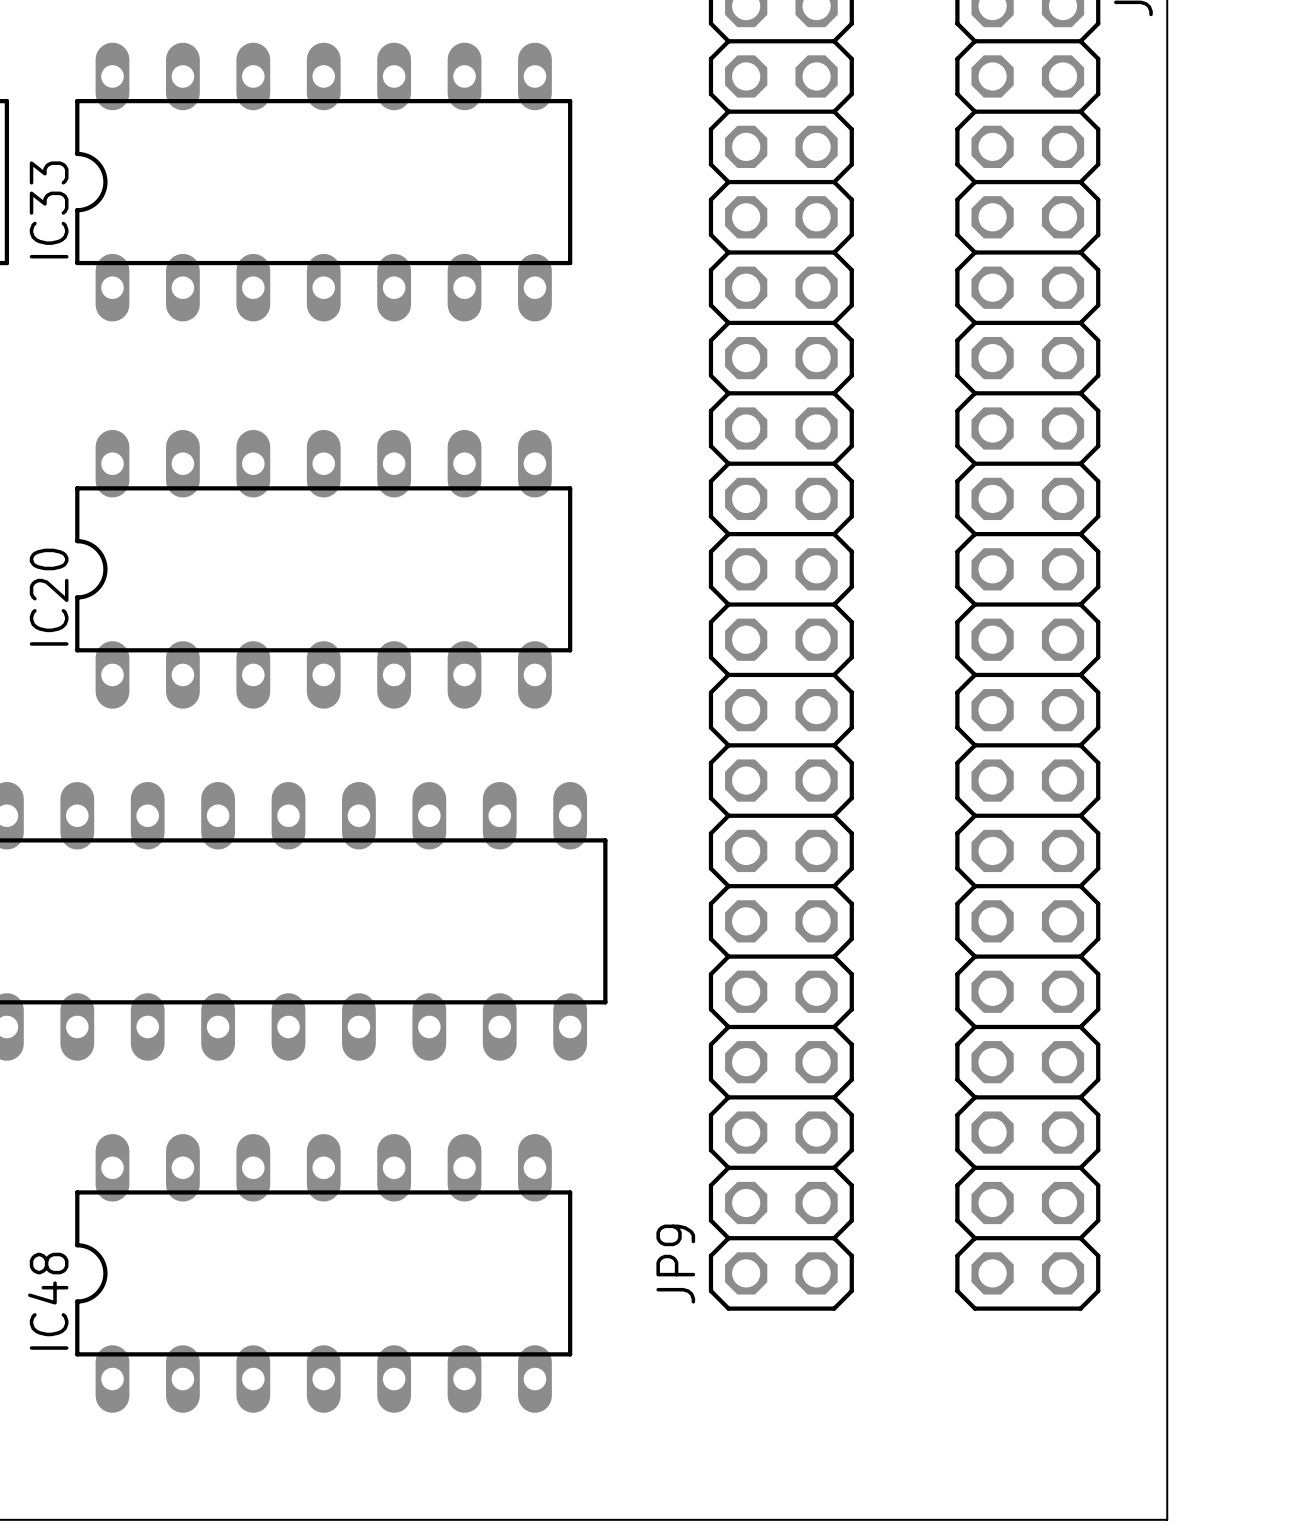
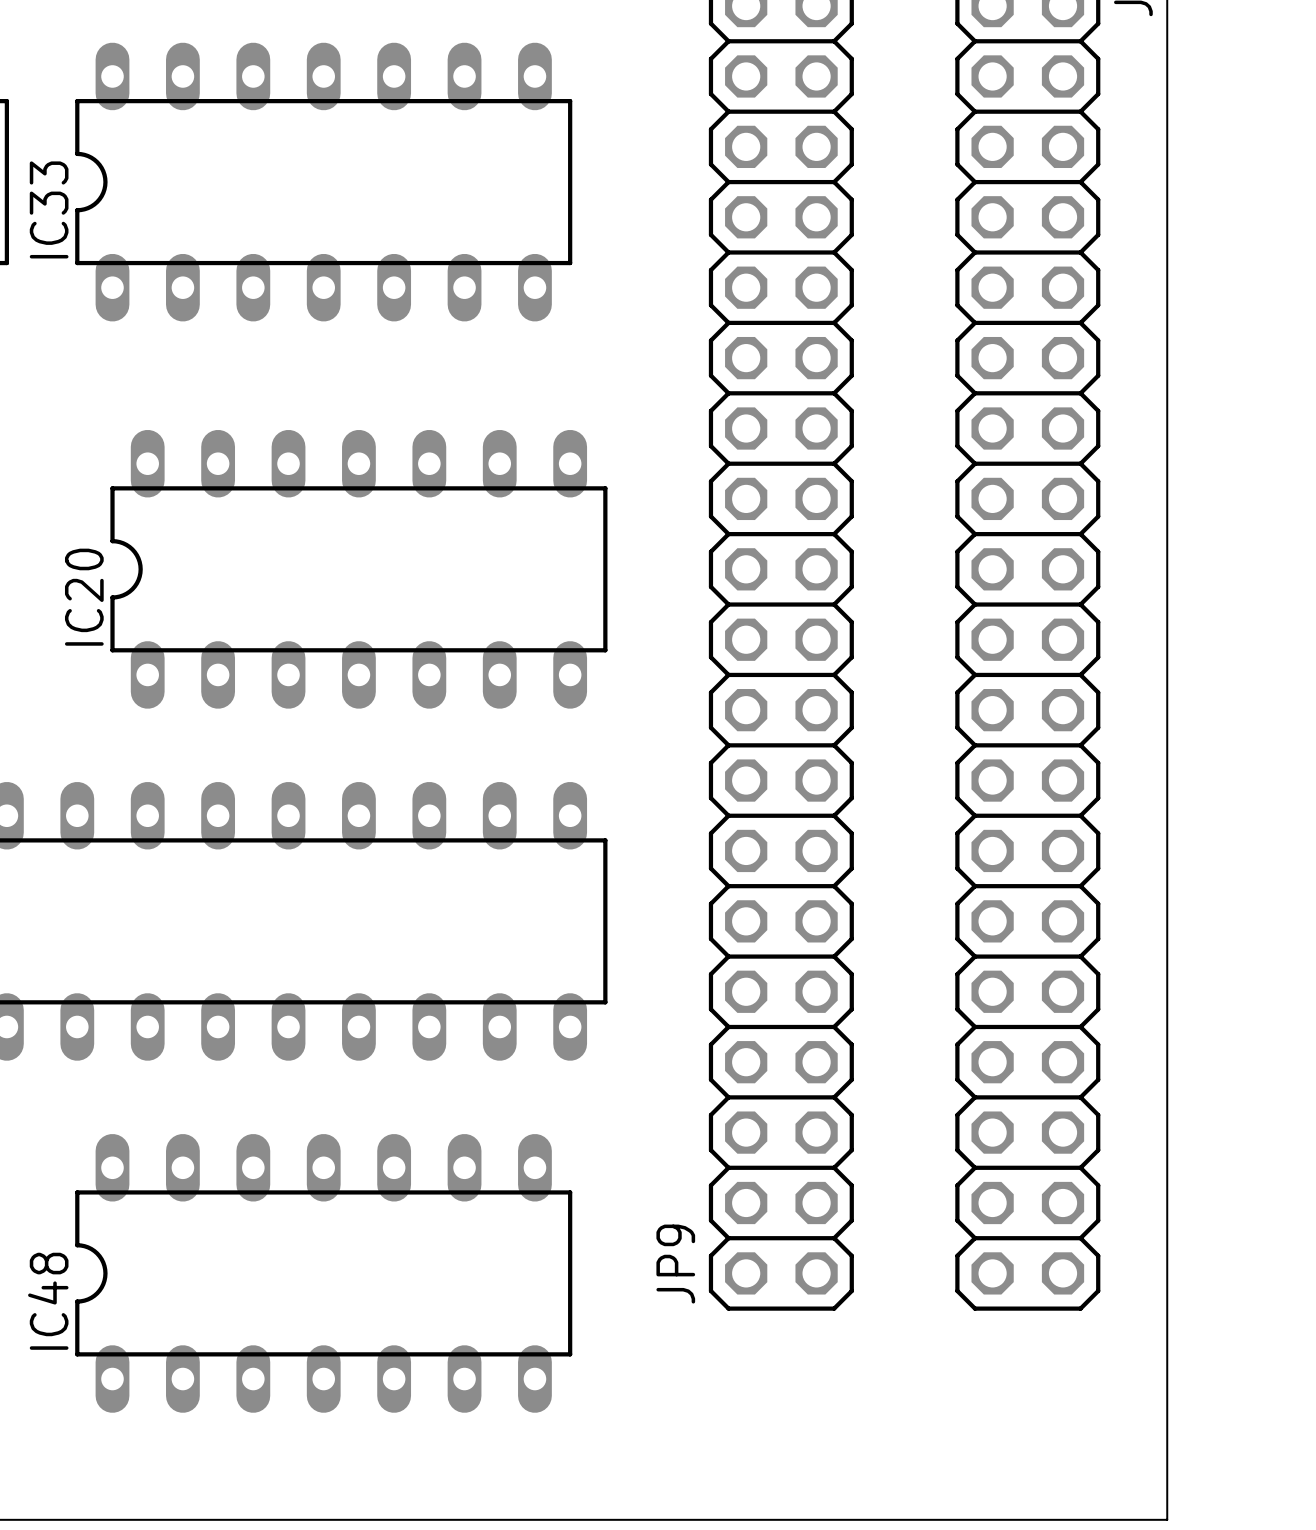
IC20 position: (323, 569) -> (358, 569)

